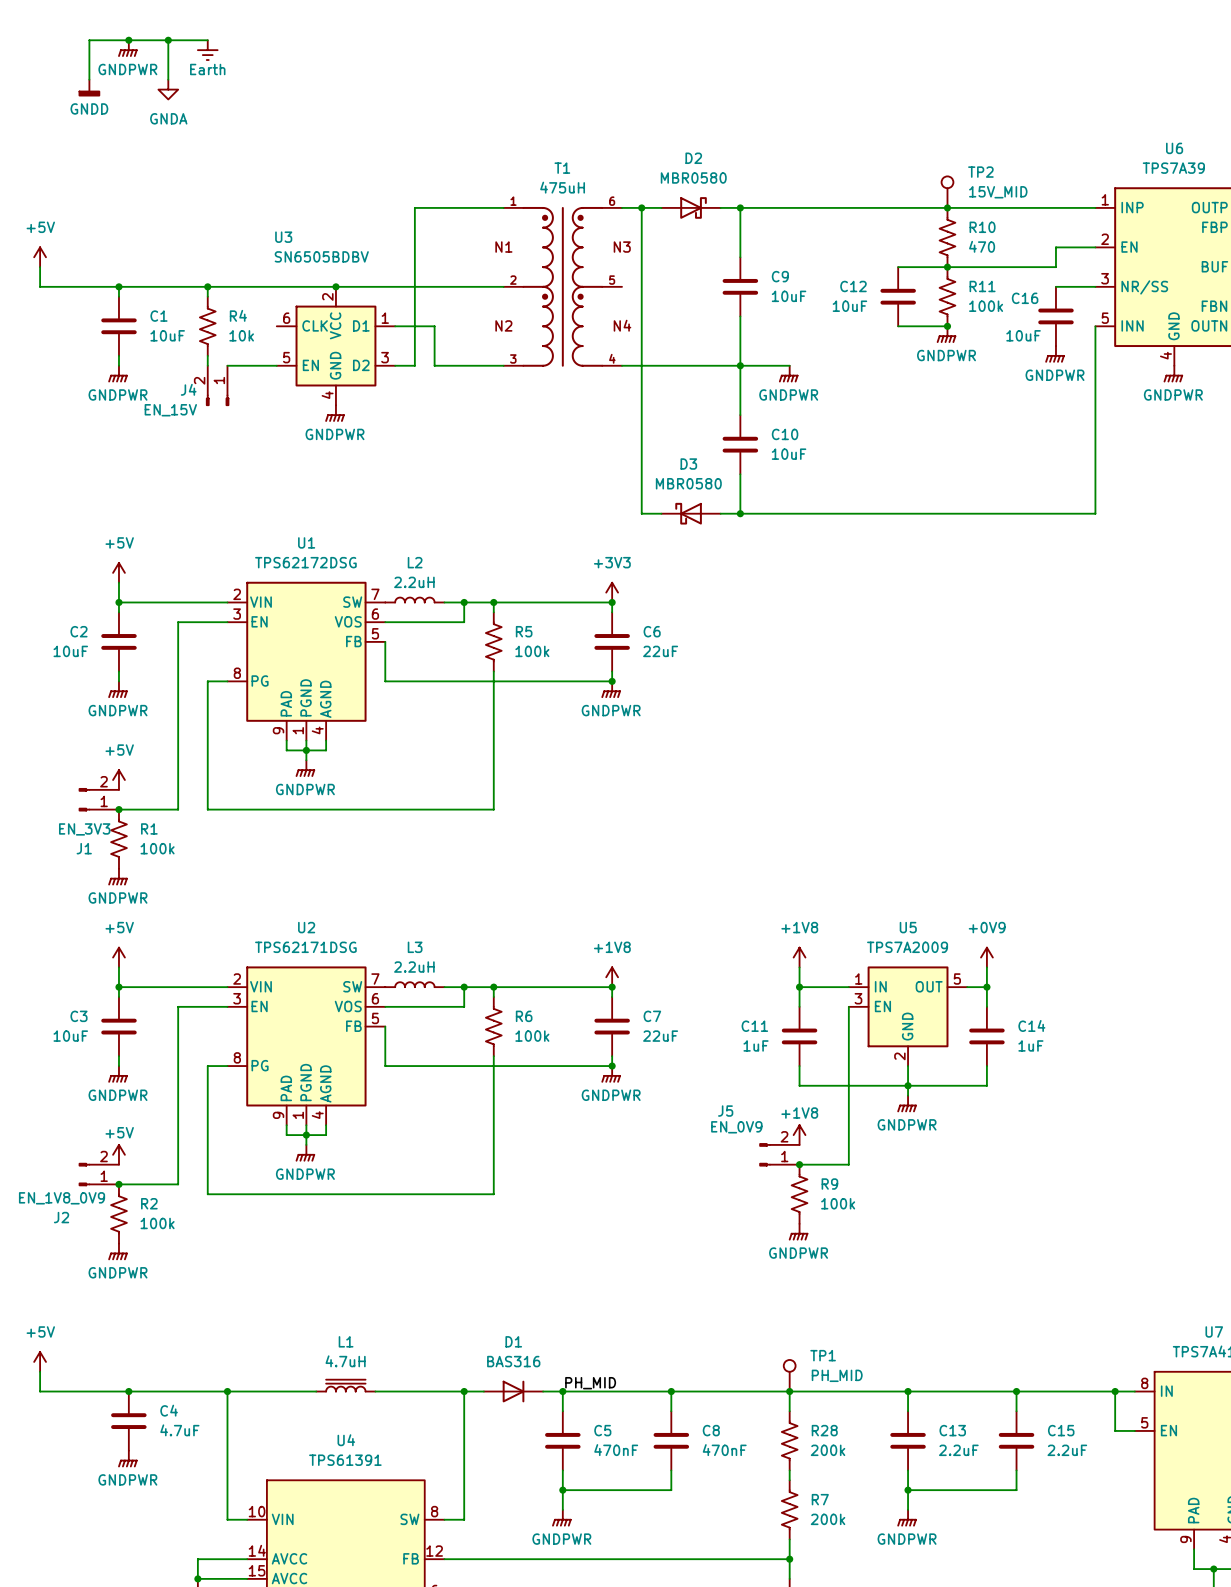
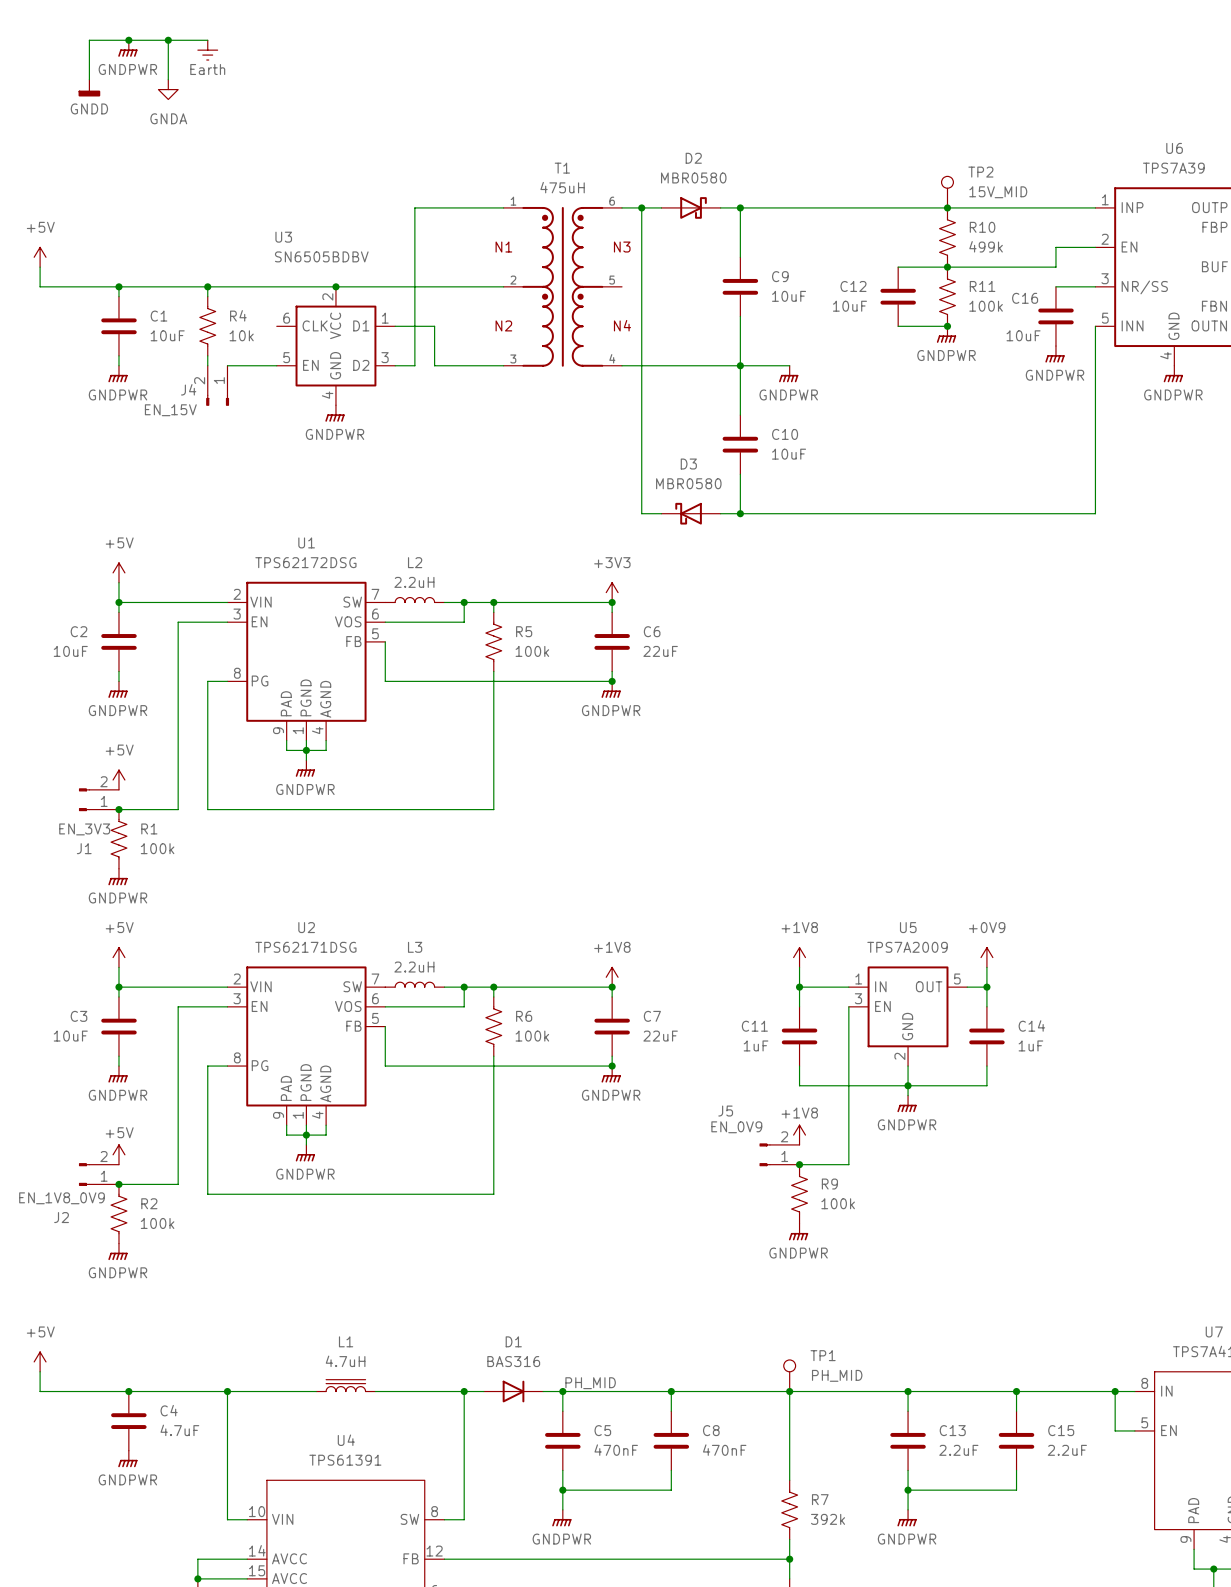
R10 value: 470 (982, 246) -> 499k (986, 246)
R28: 200k (789, 1440) -> none
R7 value: 200k (828, 1519) -> 392k (828, 1519)

